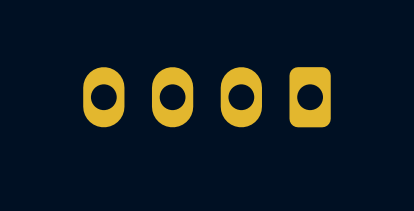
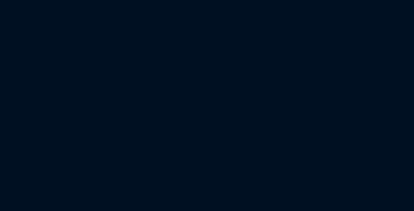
part: (206, 97) -> none

